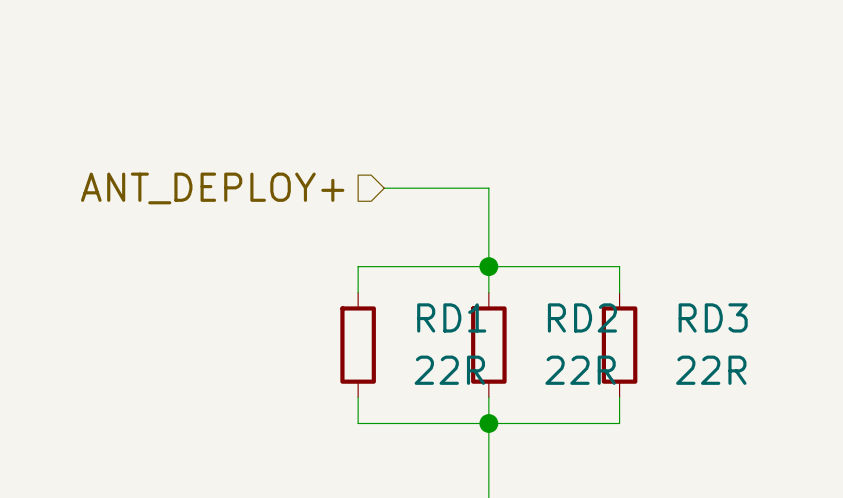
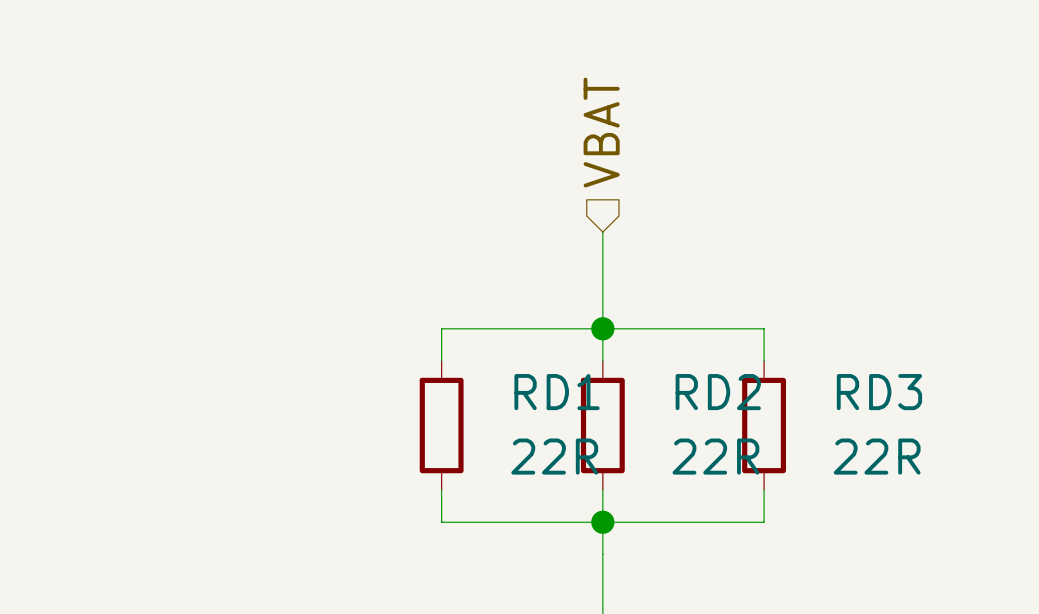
hierarchical label: none -> VBAT (601, 132)
hierarchical label: ANT_DEPLOY+ (212, 188) -> none
wire: (384, 188) (488, 188) -> none

